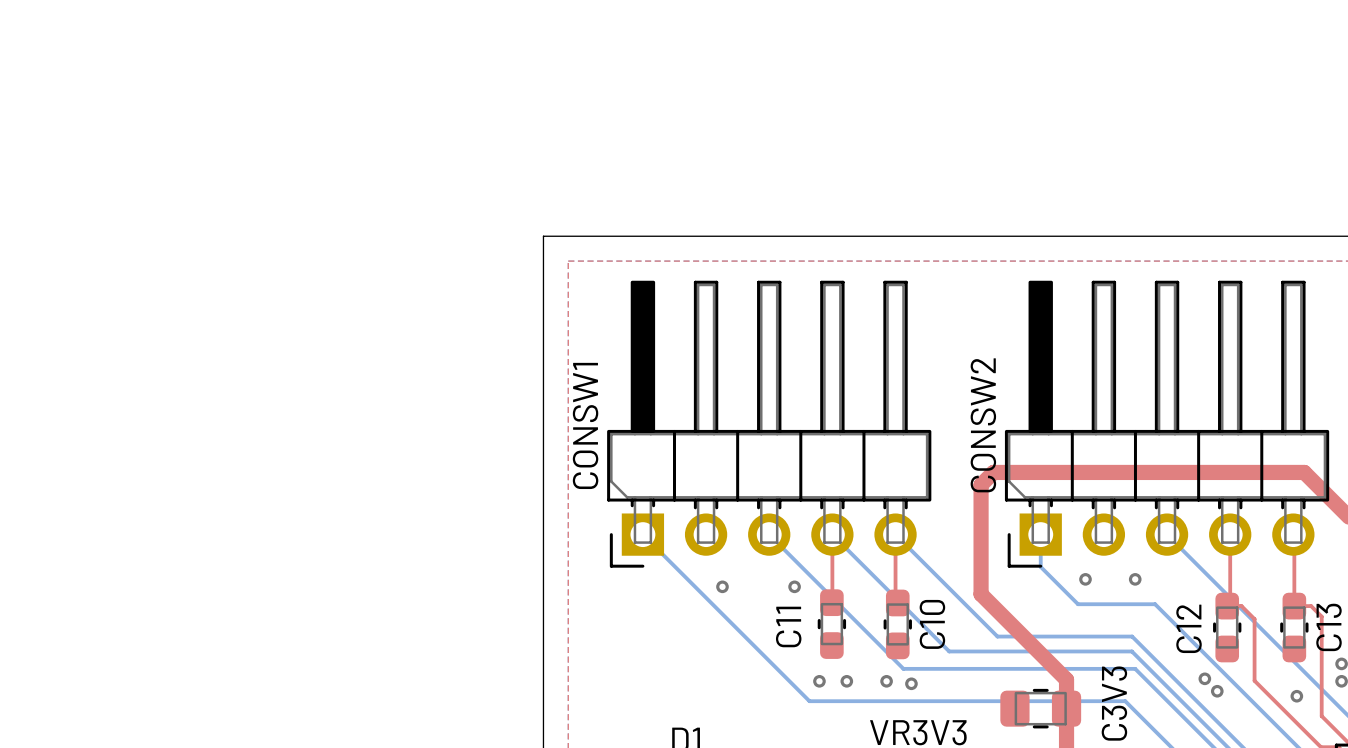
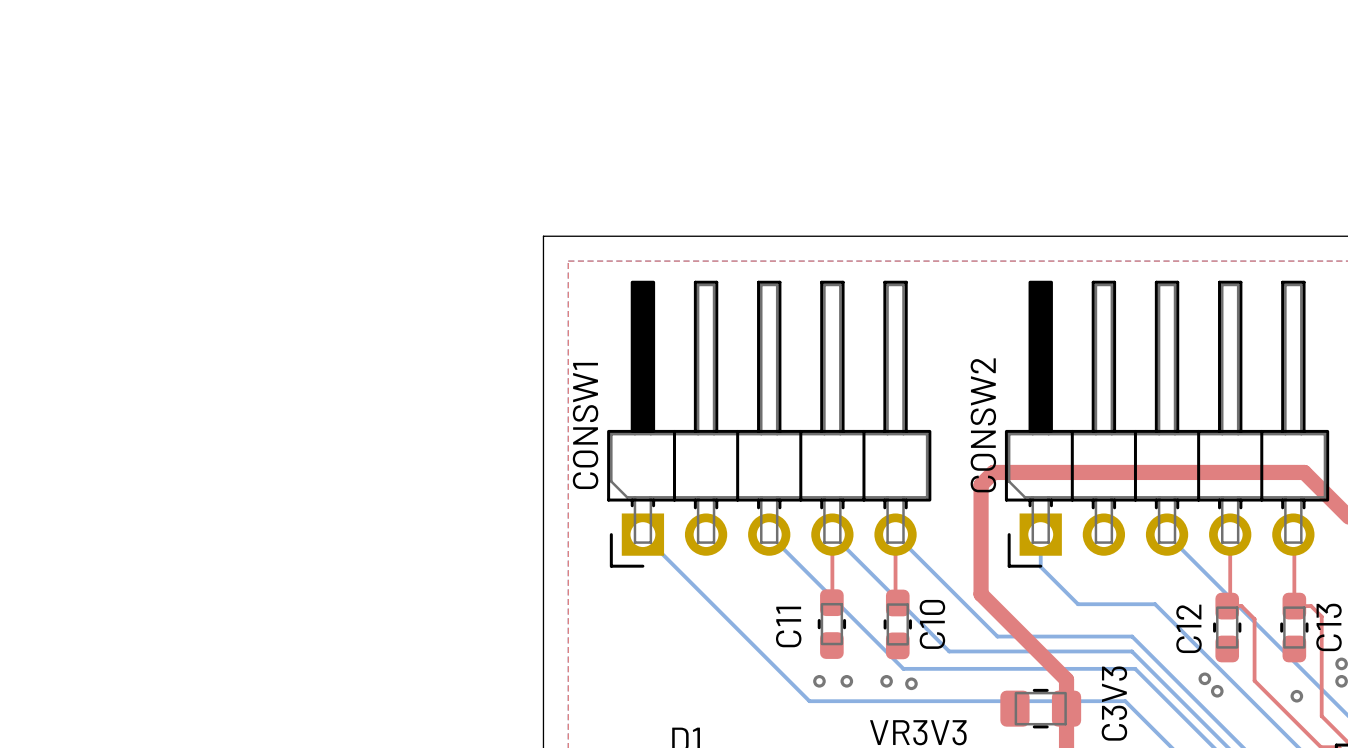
via: (1085, 579) -> none
via: (1135, 579) -> none
via: (722, 586) -> none
via: (794, 586) -> none

